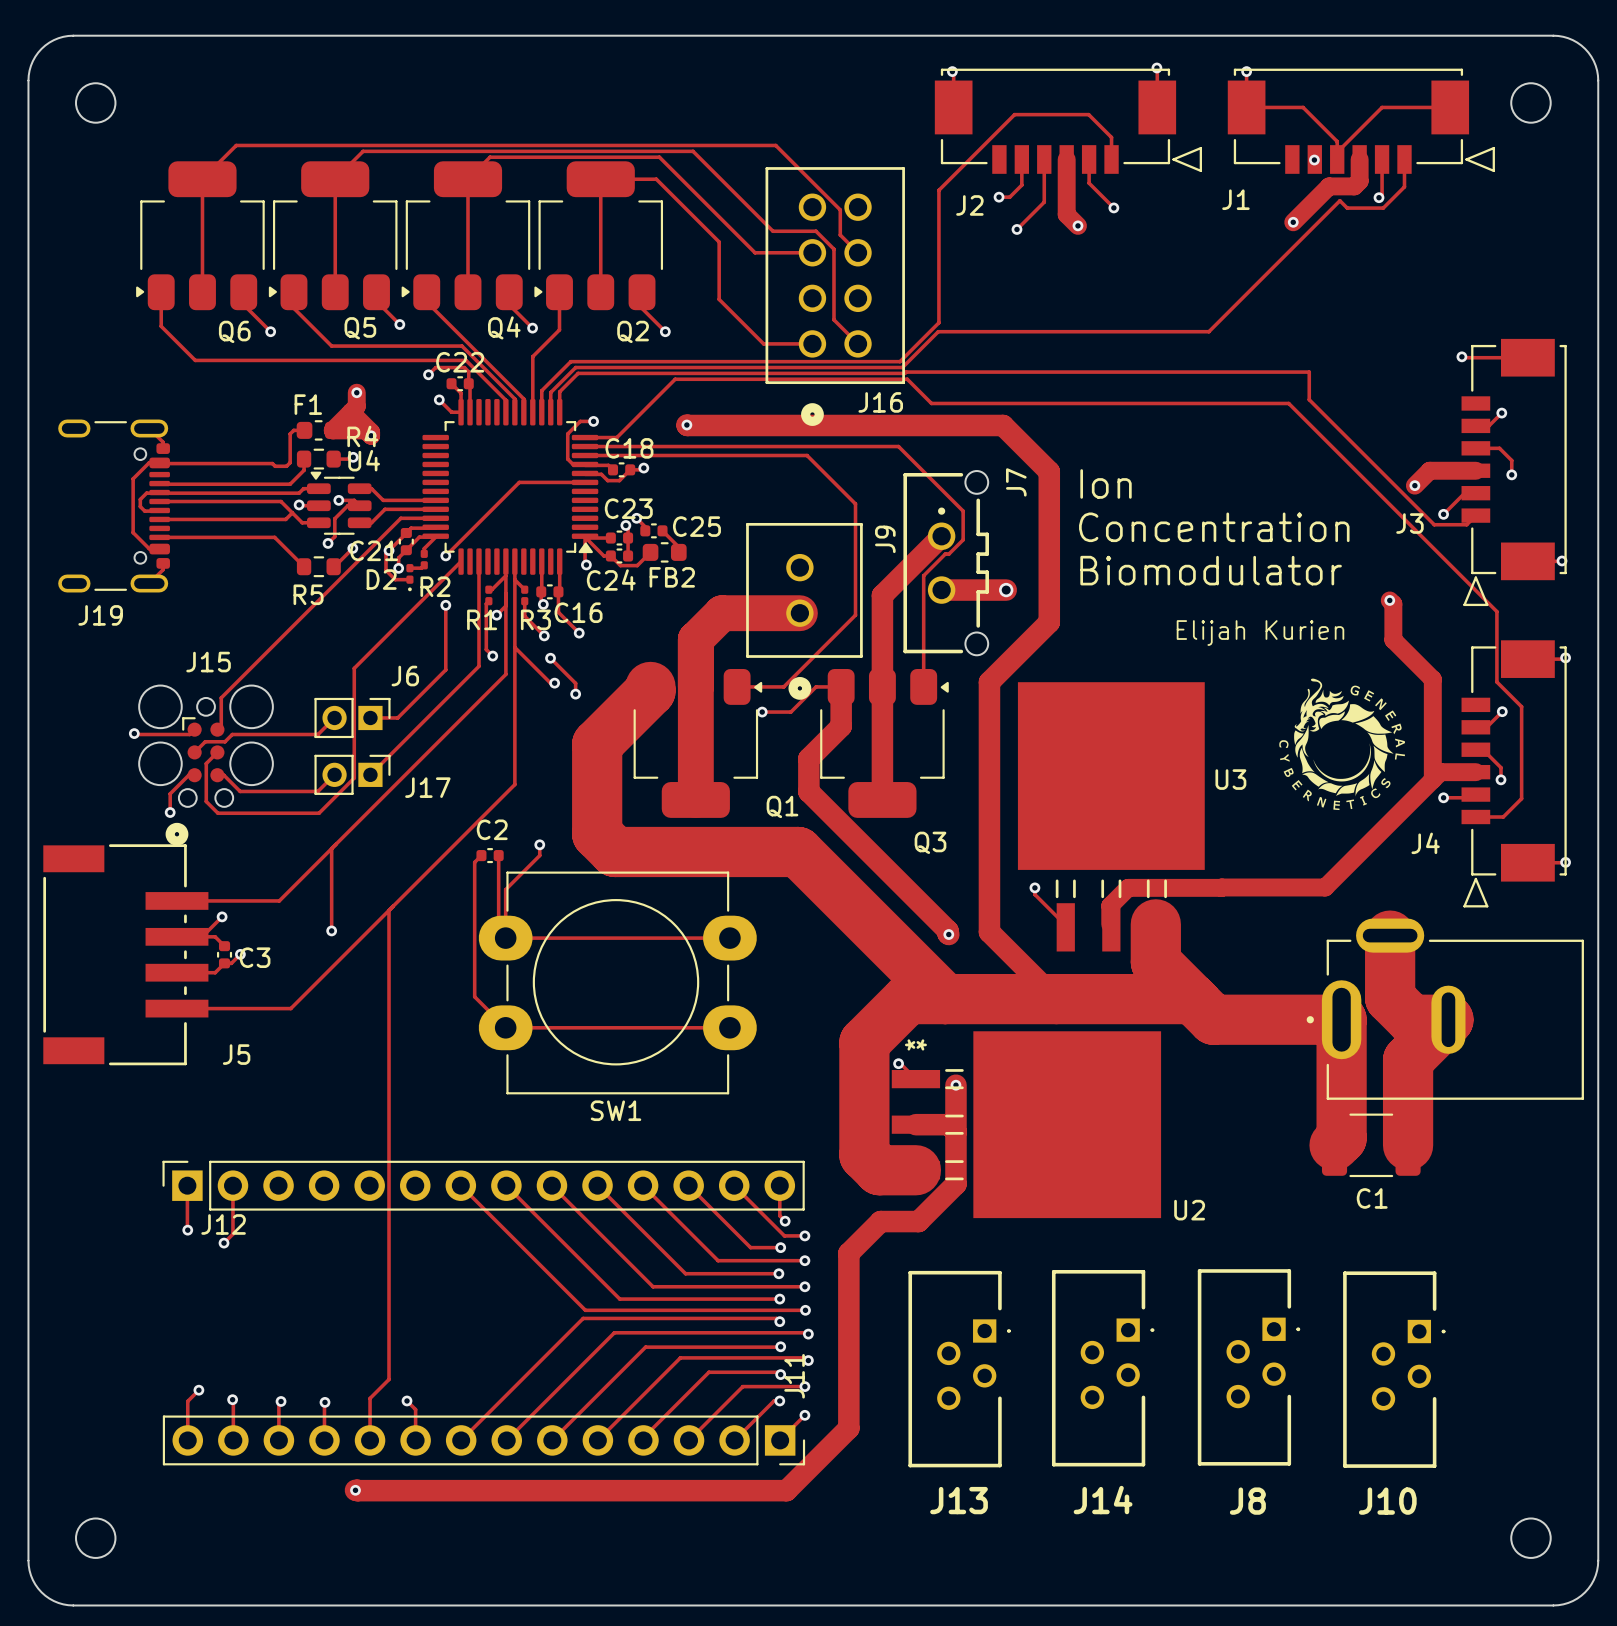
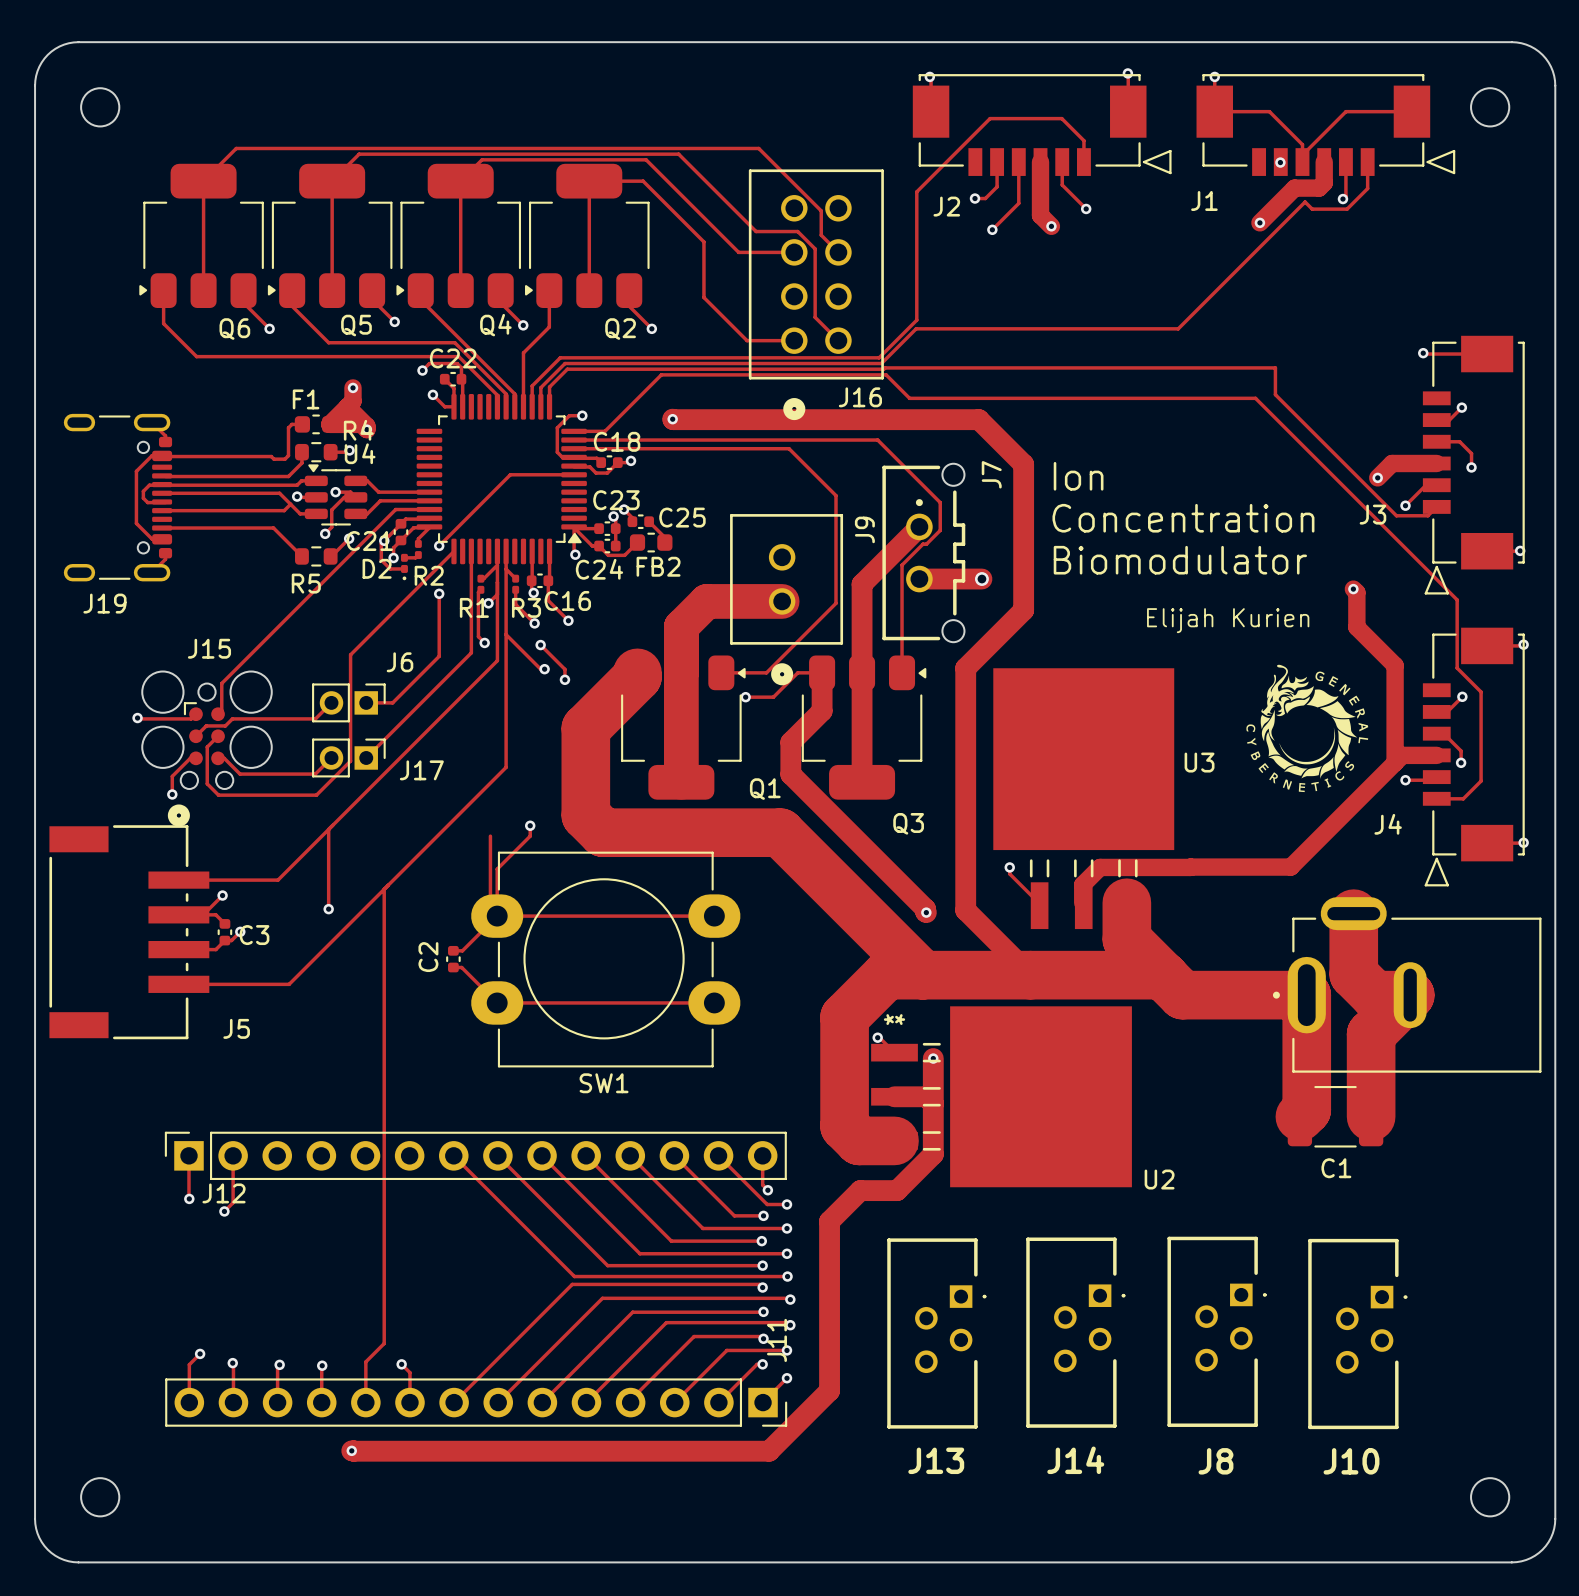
track: (481, 855) (474, 862) (474, 996) -> (453, 967) (461, 967) (467, 972)
C2 rotation: 0° (490, 855) -> 90° clockwise (453, 959)
C2 position: (490, 855) -> (453, 959)
track: none -> (497, 916) (462, 950) (453, 950)

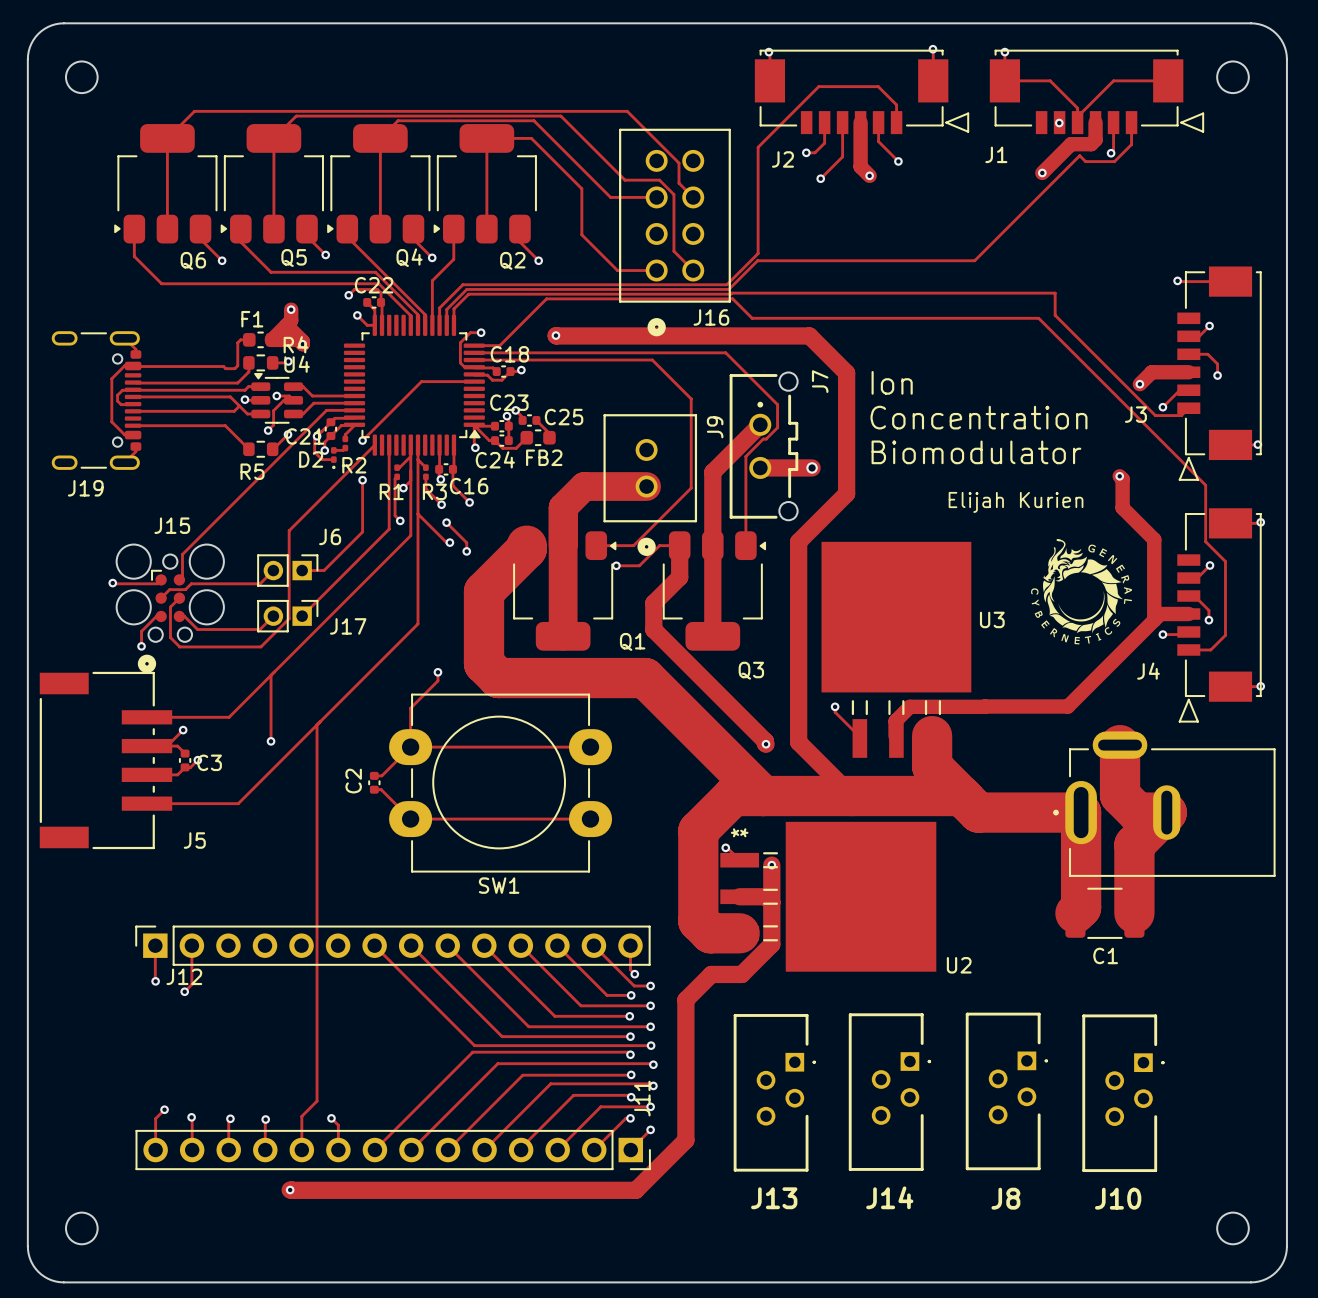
track: (490, 836) (490, 909) -> none

